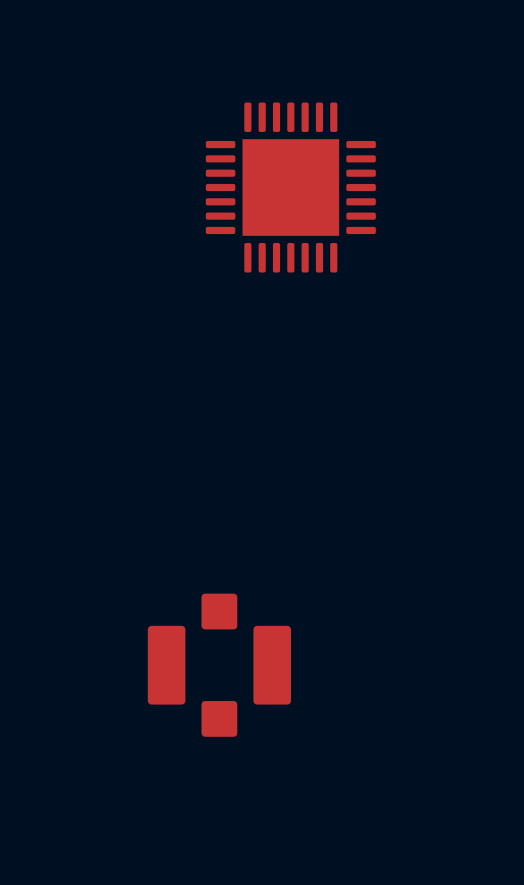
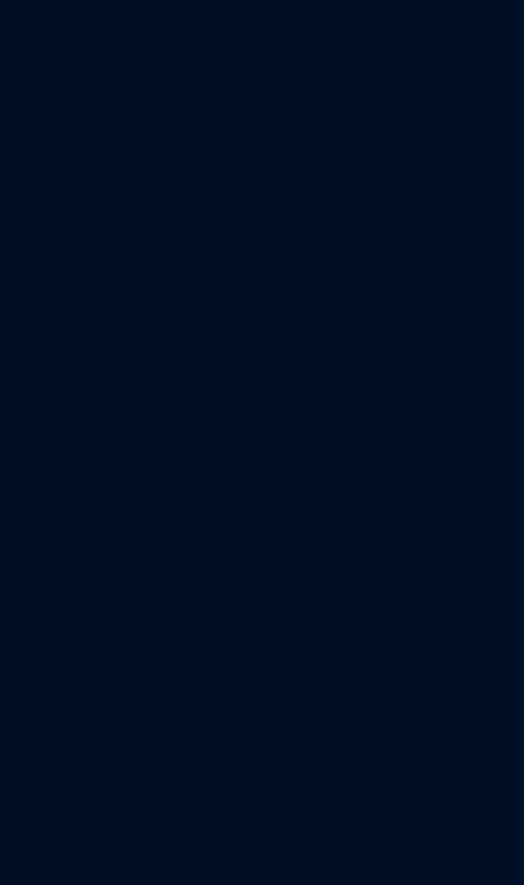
part: (290, 187) -> none
part: (219, 665) -> none

